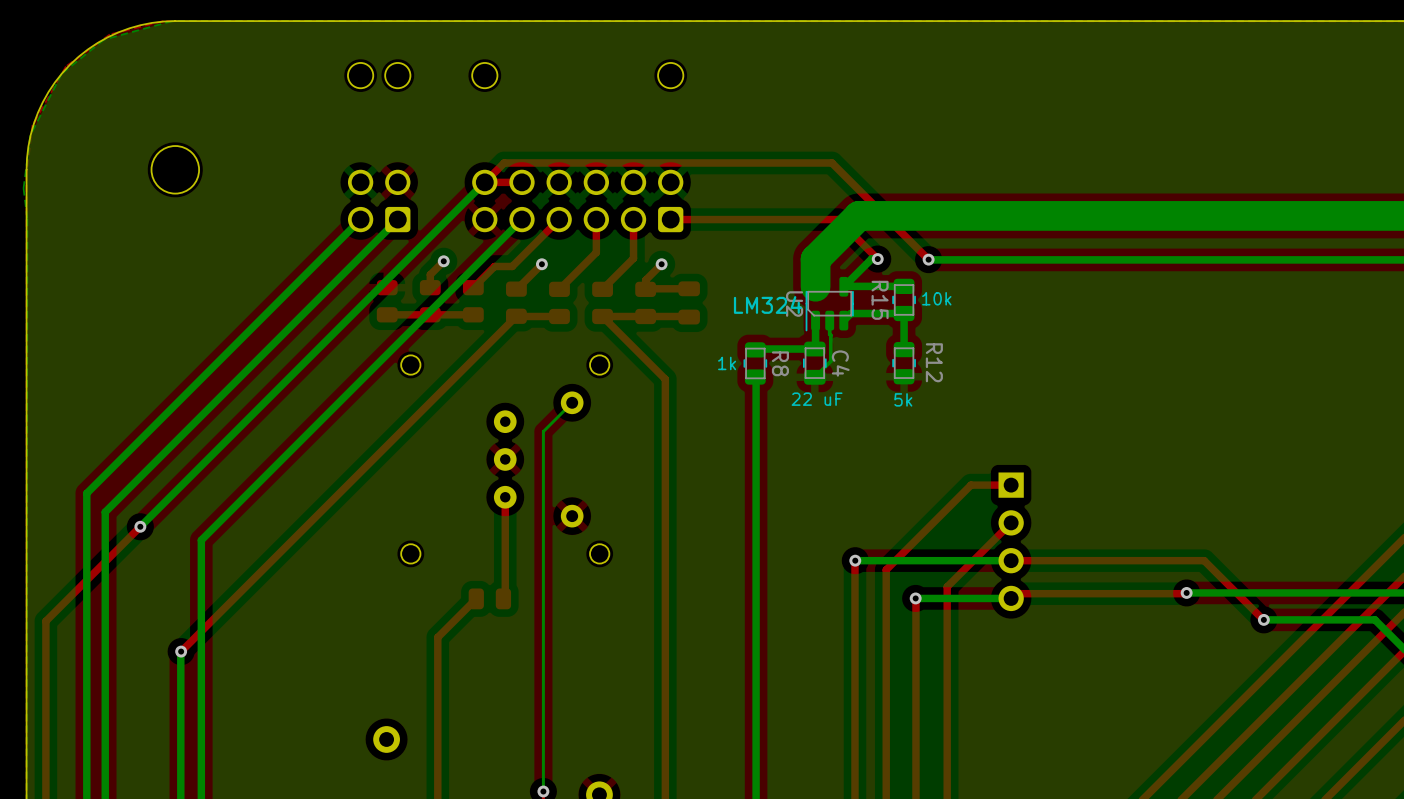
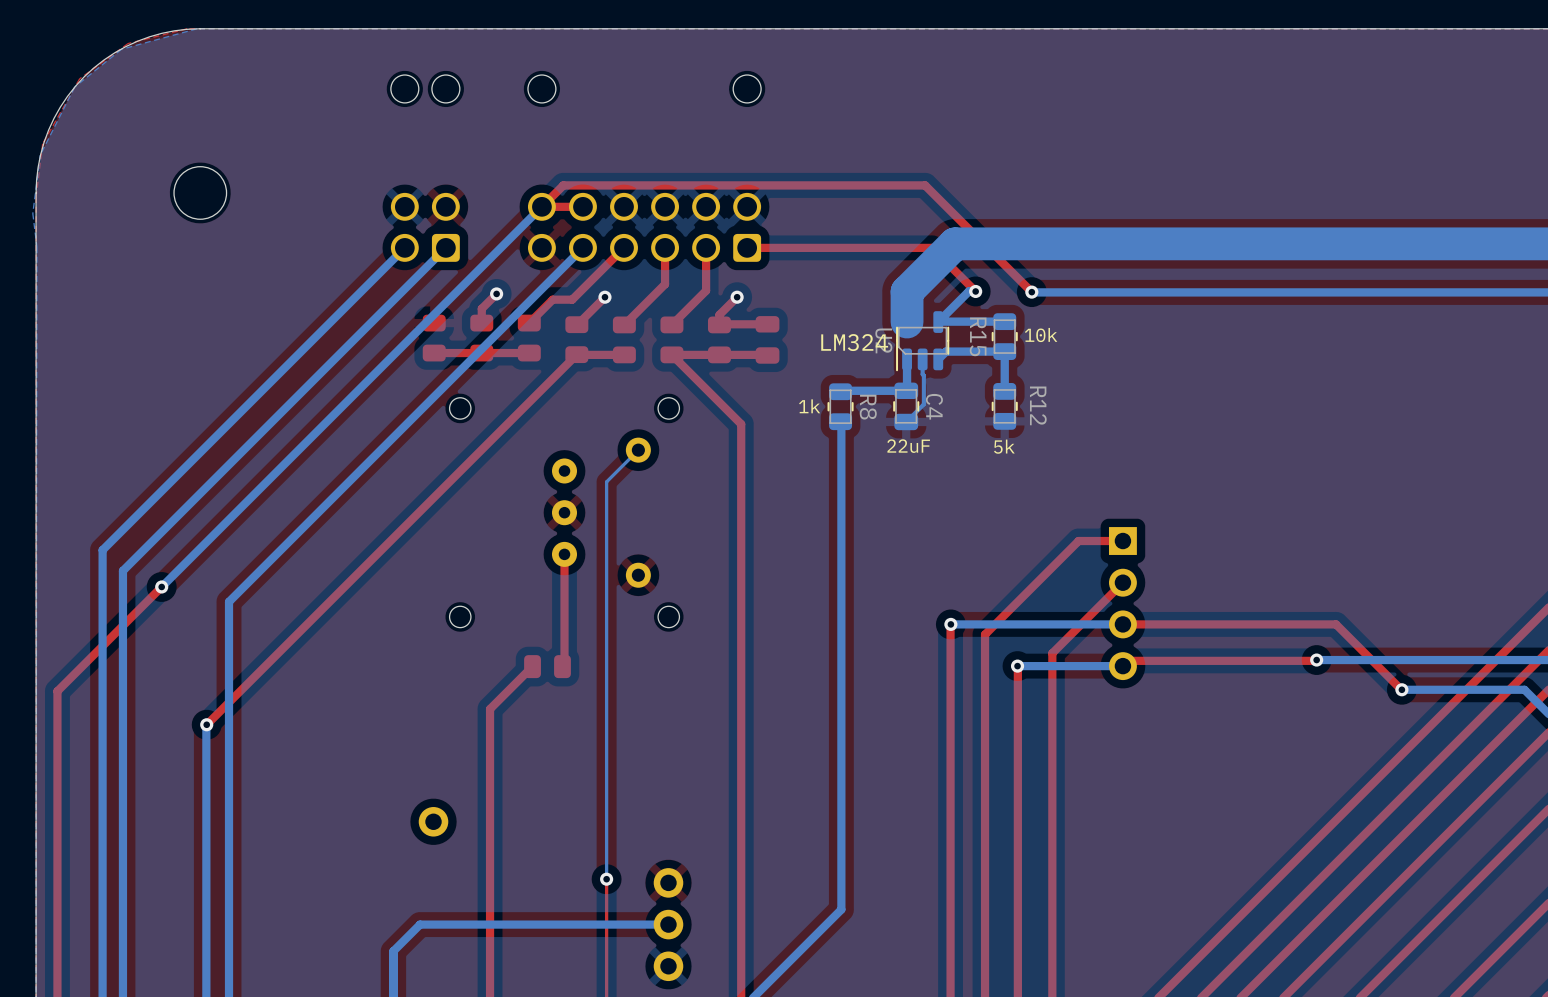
C4 value: 22 uF (817, 399) -> 22uF (908, 446)

